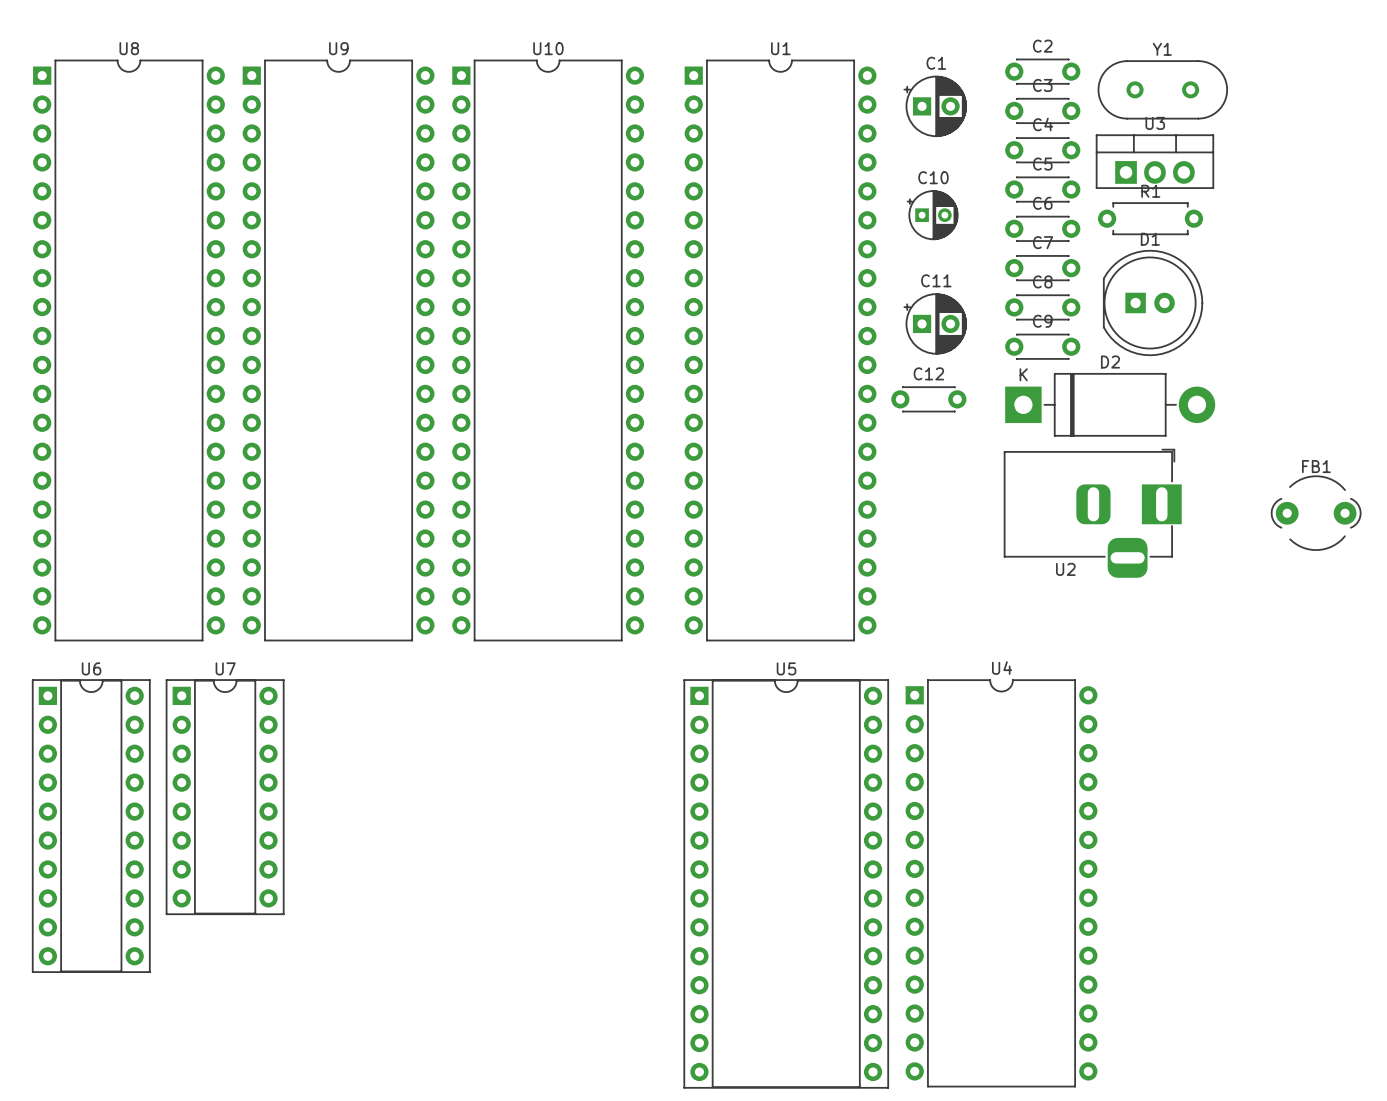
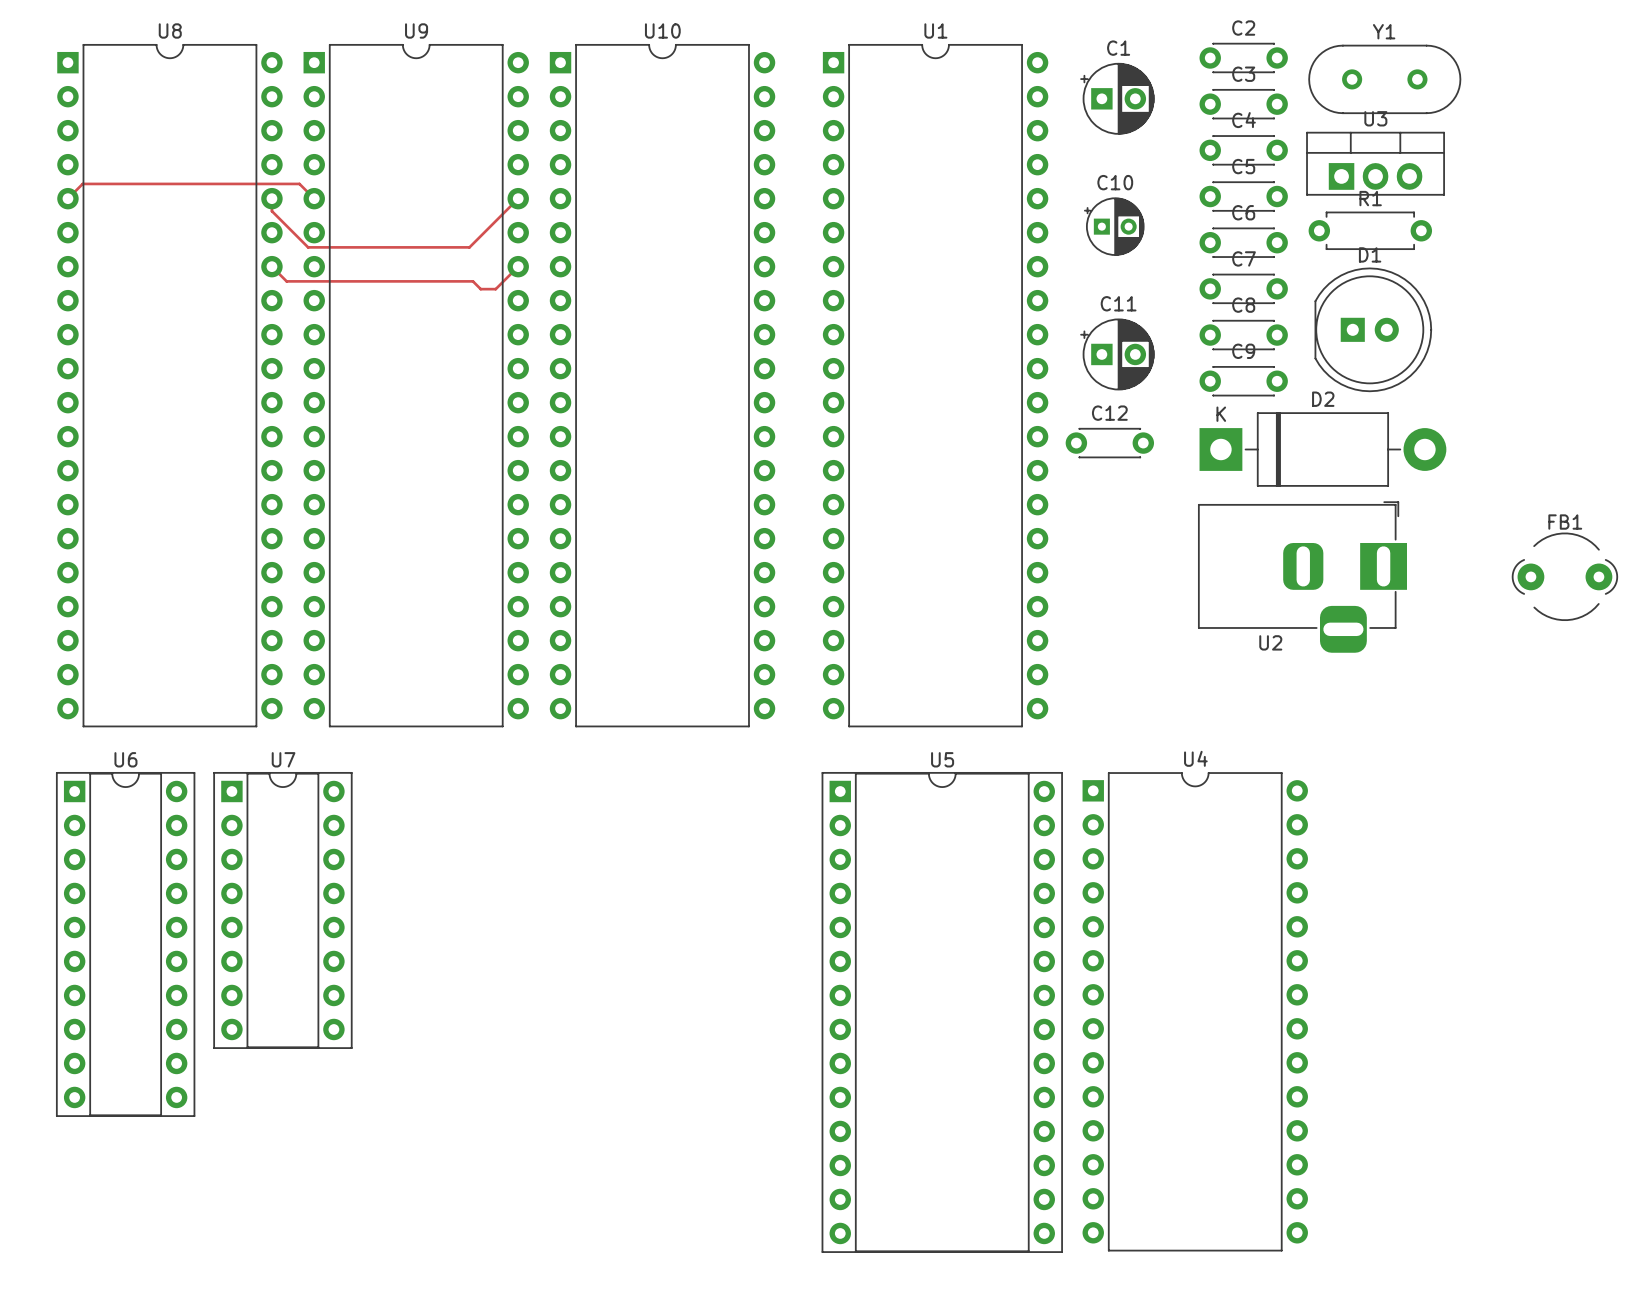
top track: none -> (67, 198) (82, 183) (299, 183) (314, 198)
top track: none -> (271, 198) (271, 211) (308, 247) (469, 247) (518, 198)
top track: none -> (271, 266) (286, 281) (472, 281) (480, 289) (495, 289) (518, 266)

